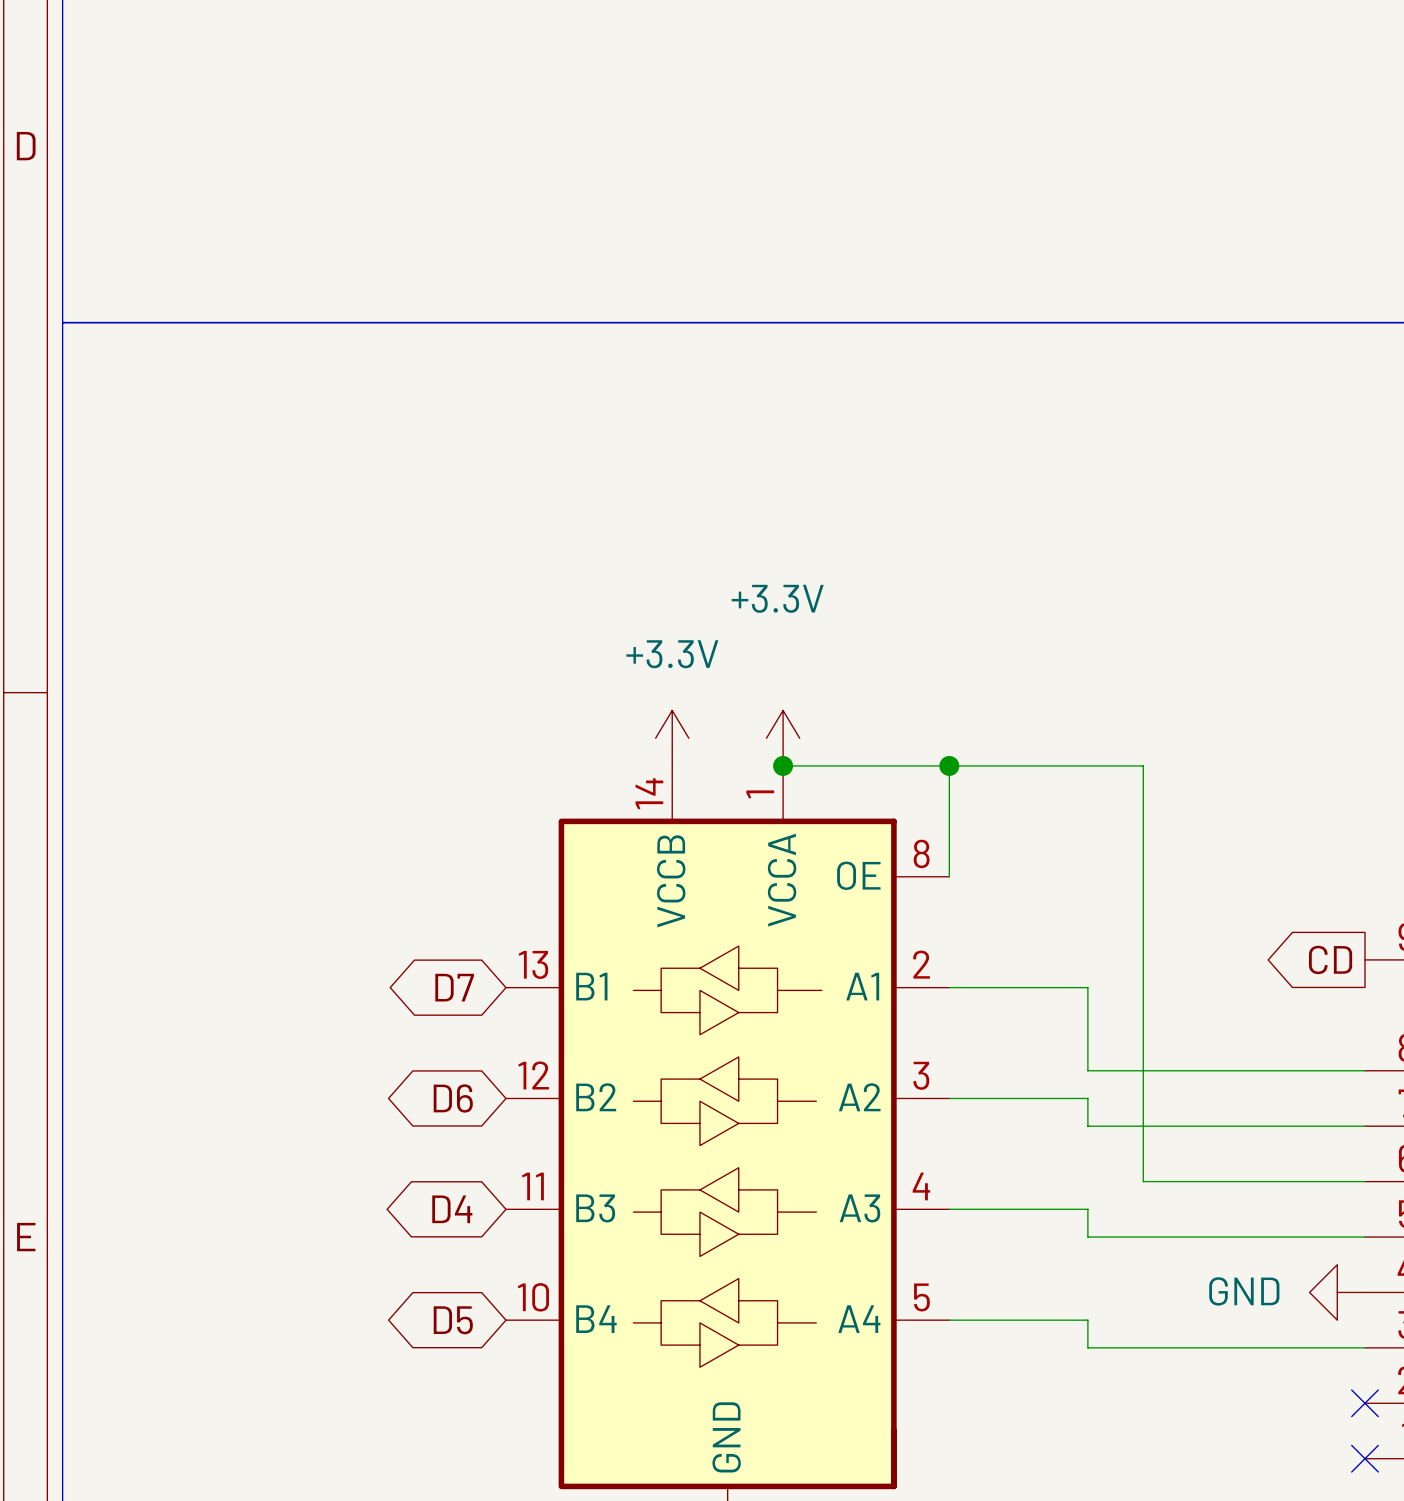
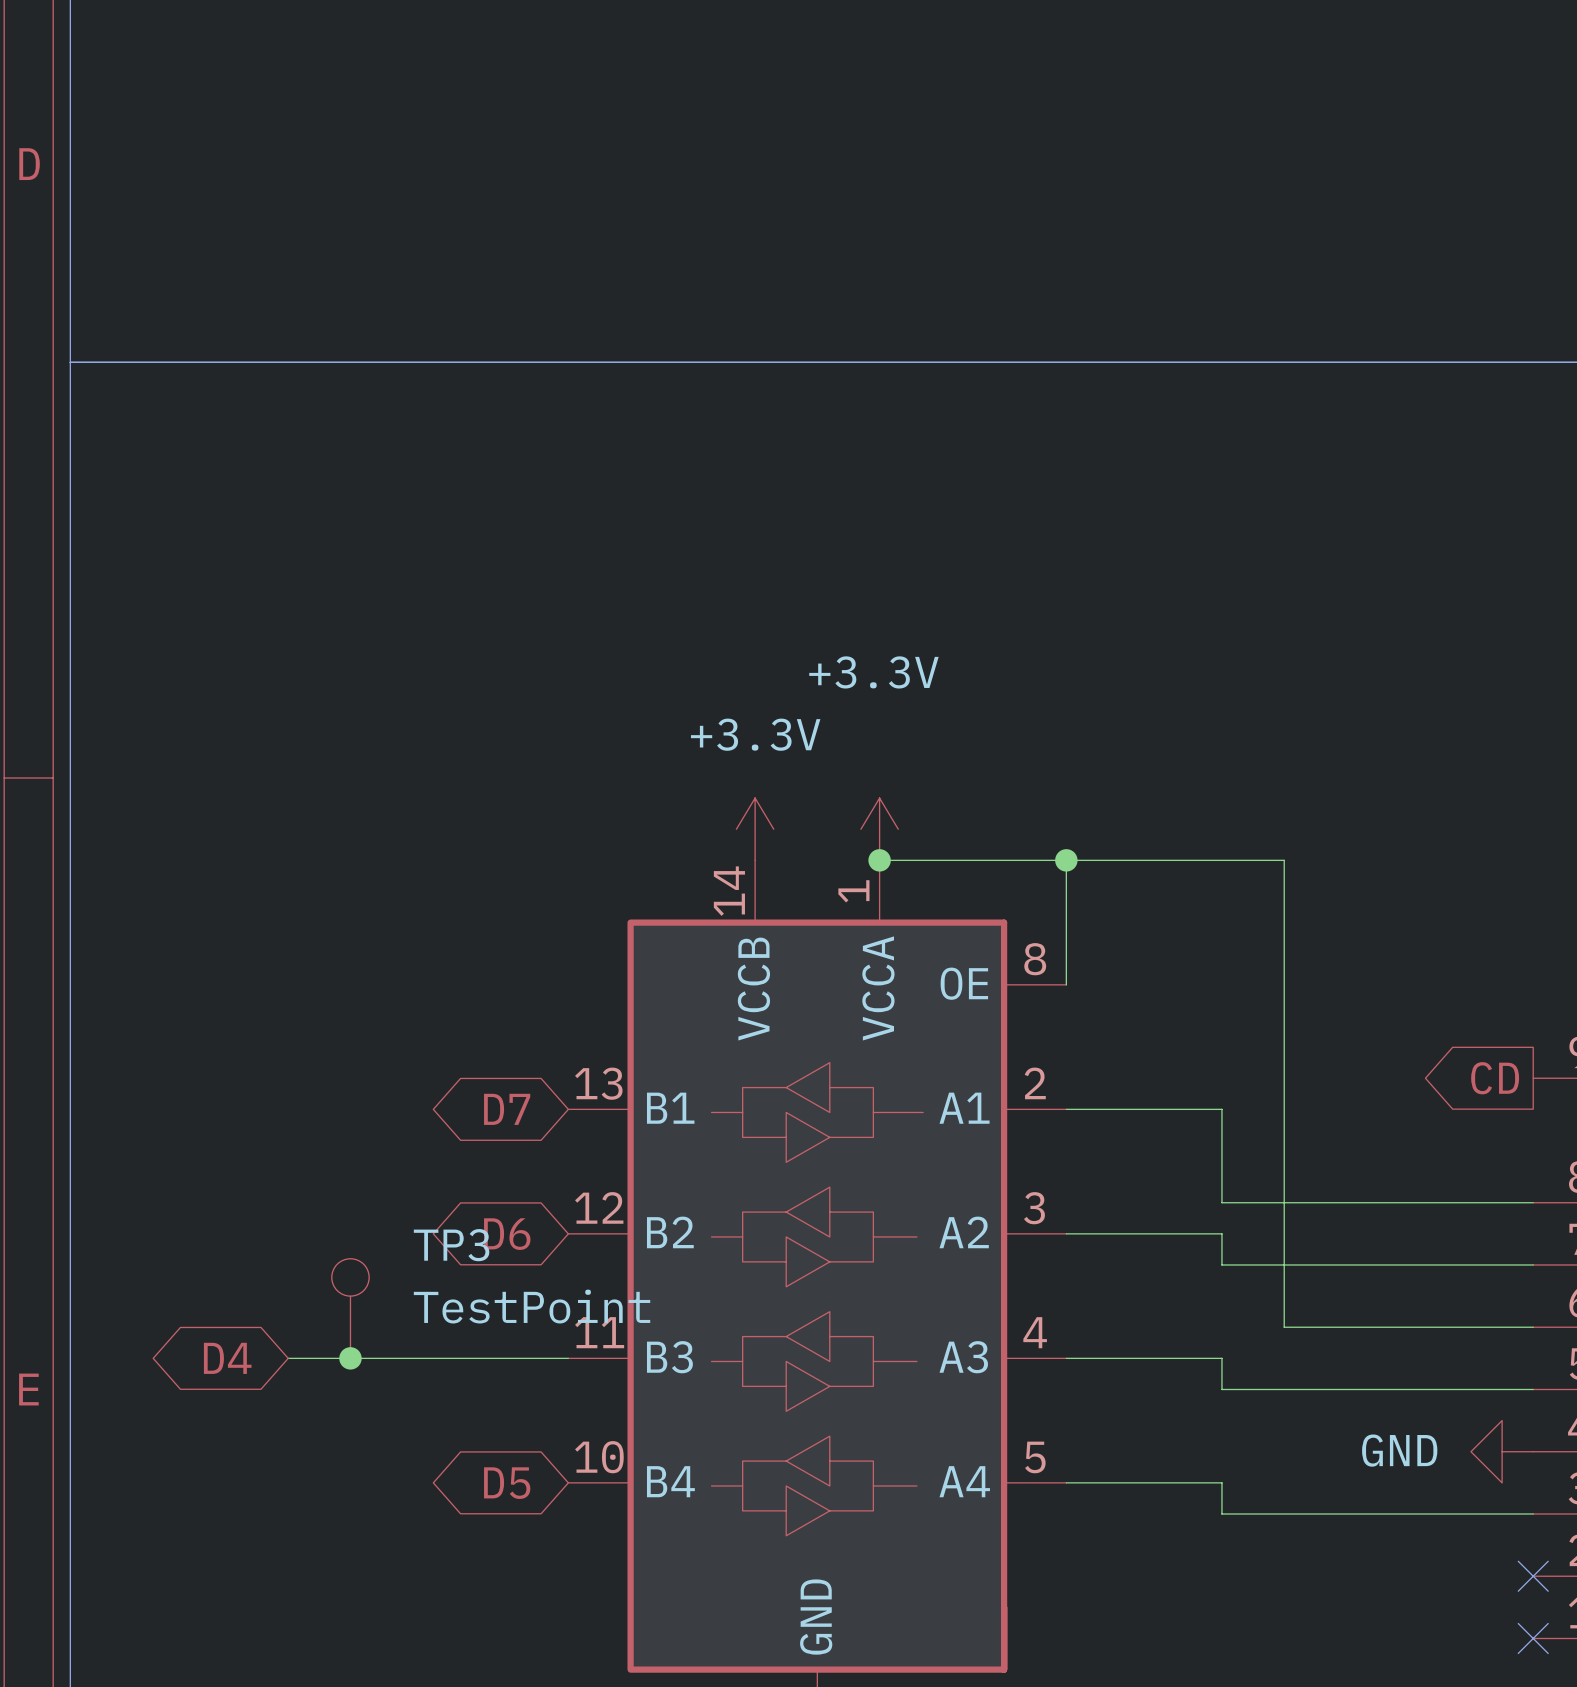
TP3: none -> TestPoint (350, 1308)
wire: none -> (288, 1358) (568, 1358)
junction: none -> (350, 1358)
global label position: D4 (452, 1209) -> D4 (227, 1358)

